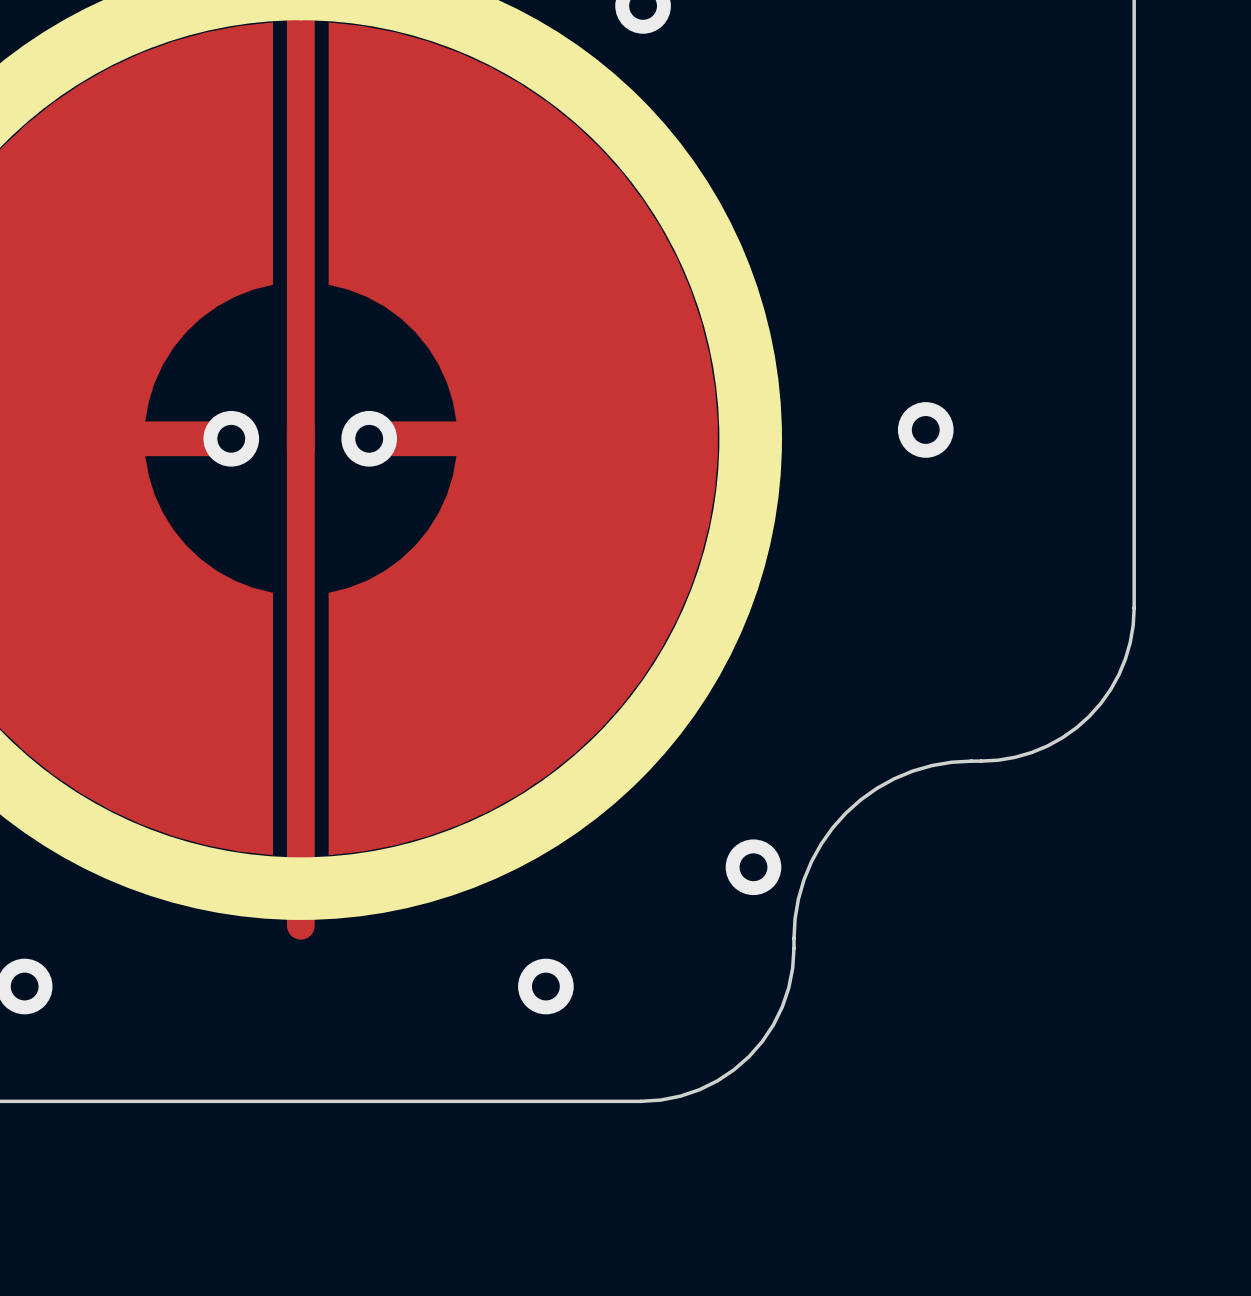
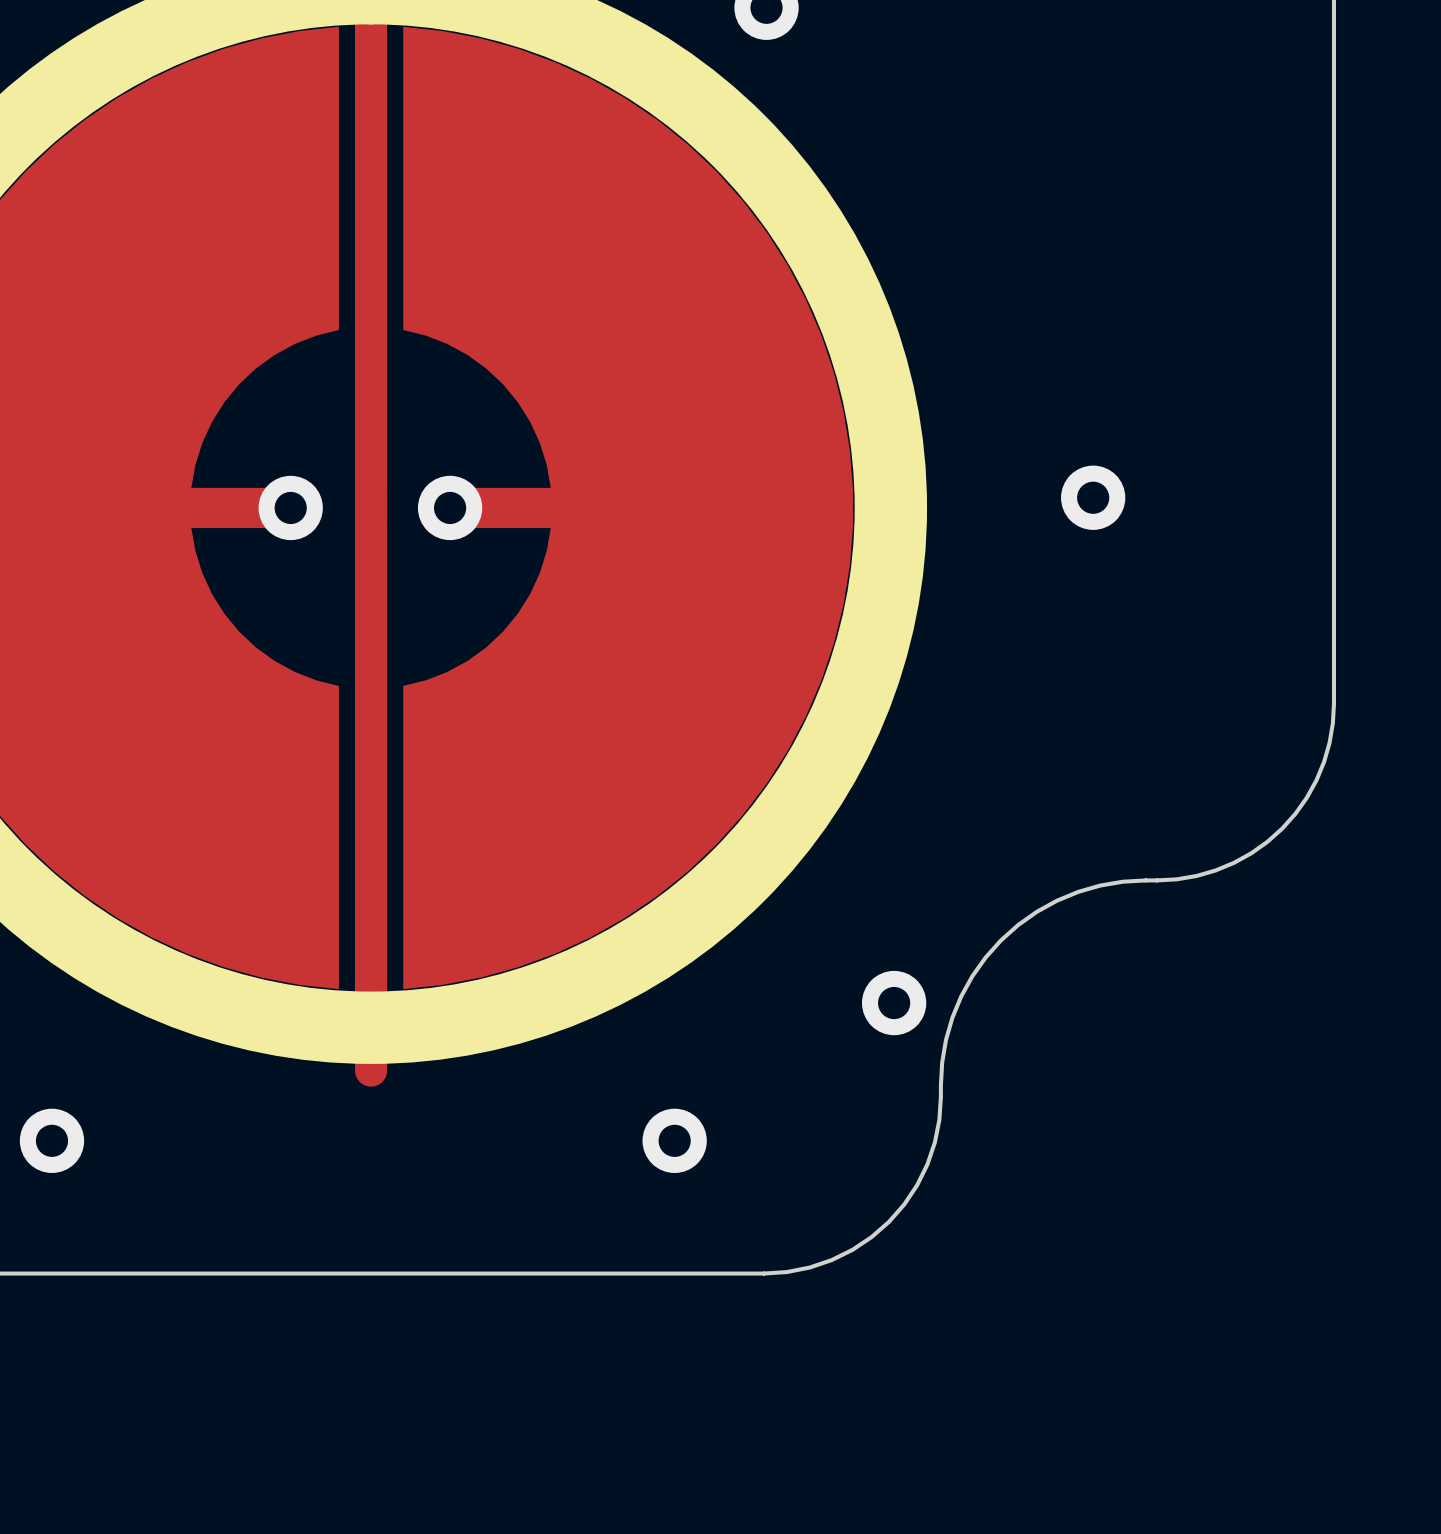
via position: (545, 986) -> (674, 1140)

